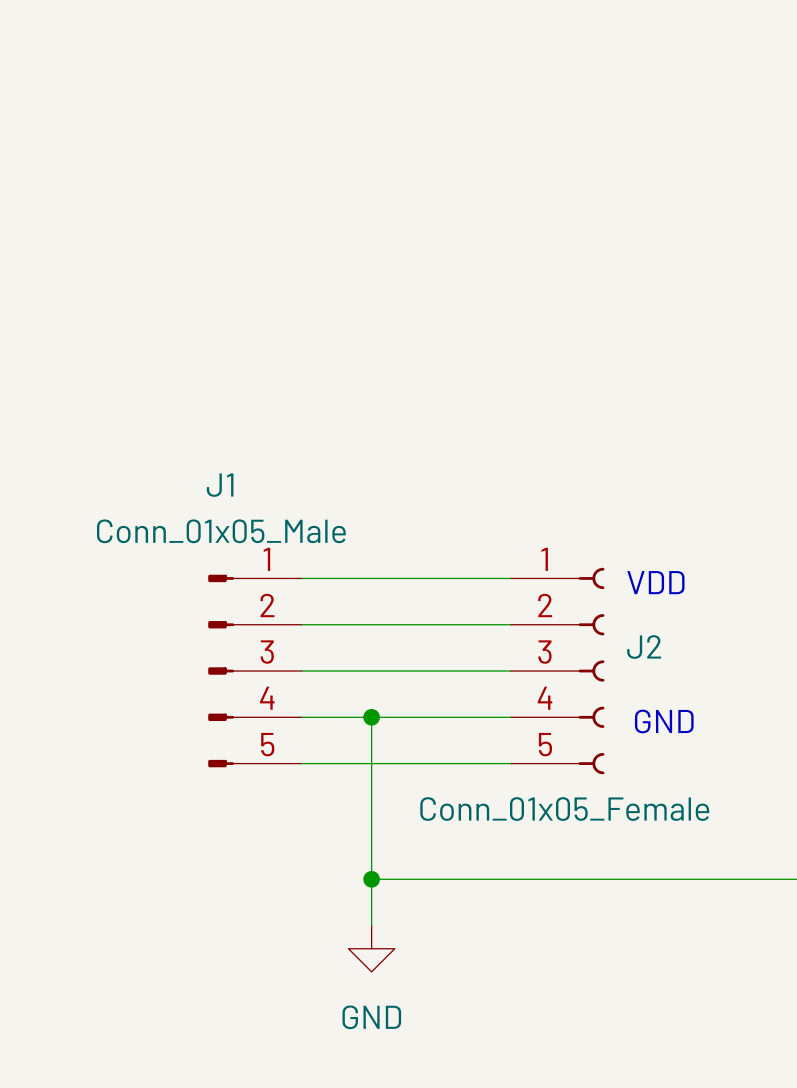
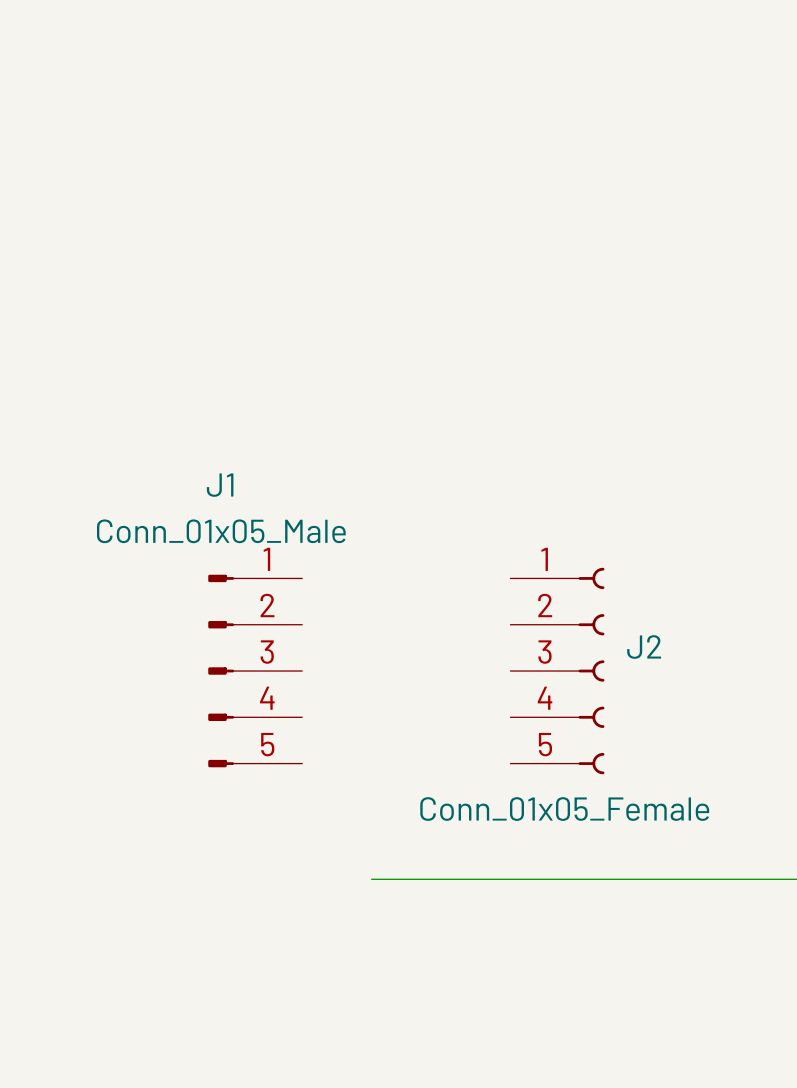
wire: (302, 578) (510, 578) -> none
text: VDD (655, 582) -> none
wire: (302, 624) (510, 624) -> none
wire: (302, 671) (510, 671) -> none
wire: (302, 717) (510, 717) -> none
wire: (371, 717) (371, 925) -> none
junction: (371, 717) -> none
text: GND (664, 721) -> none
wire: (302, 763) (510, 763) -> none
junction: (371, 879) -> none
power symbol: GND (371, 948) -> none

